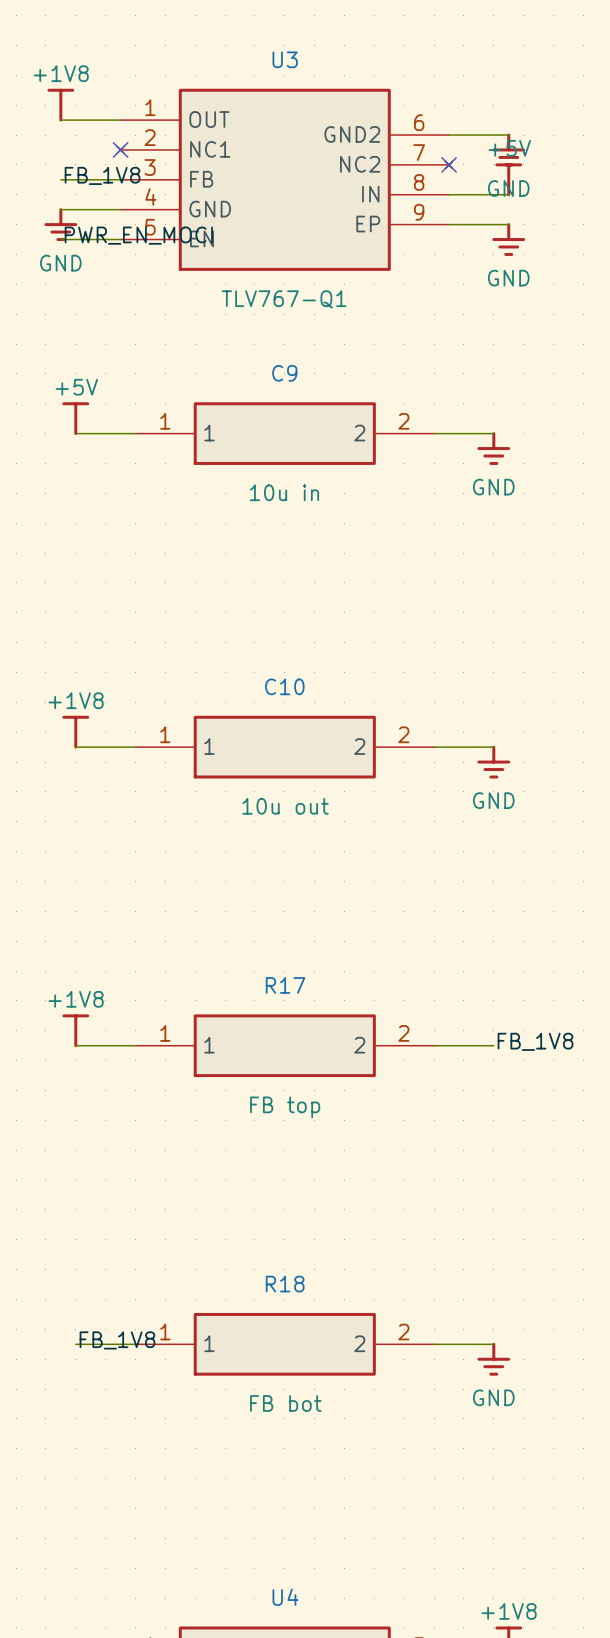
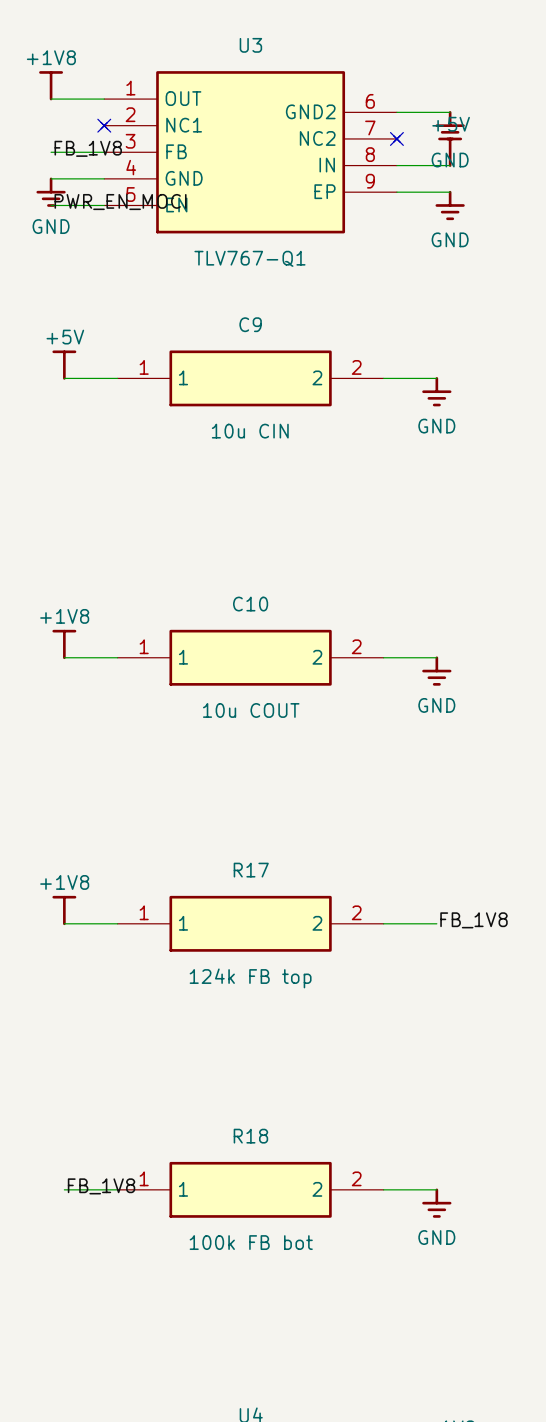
C9 value: 10u in (284, 492) -> 10u CIN (250, 431)
C10 value: 10u out (285, 806) -> 10u COUT (251, 710)
R17 value: FB top (285, 1107) -> 124k FB top (250, 978)
R18 value: FB bot (285, 1403) -> 100k FB bot (251, 1242)

